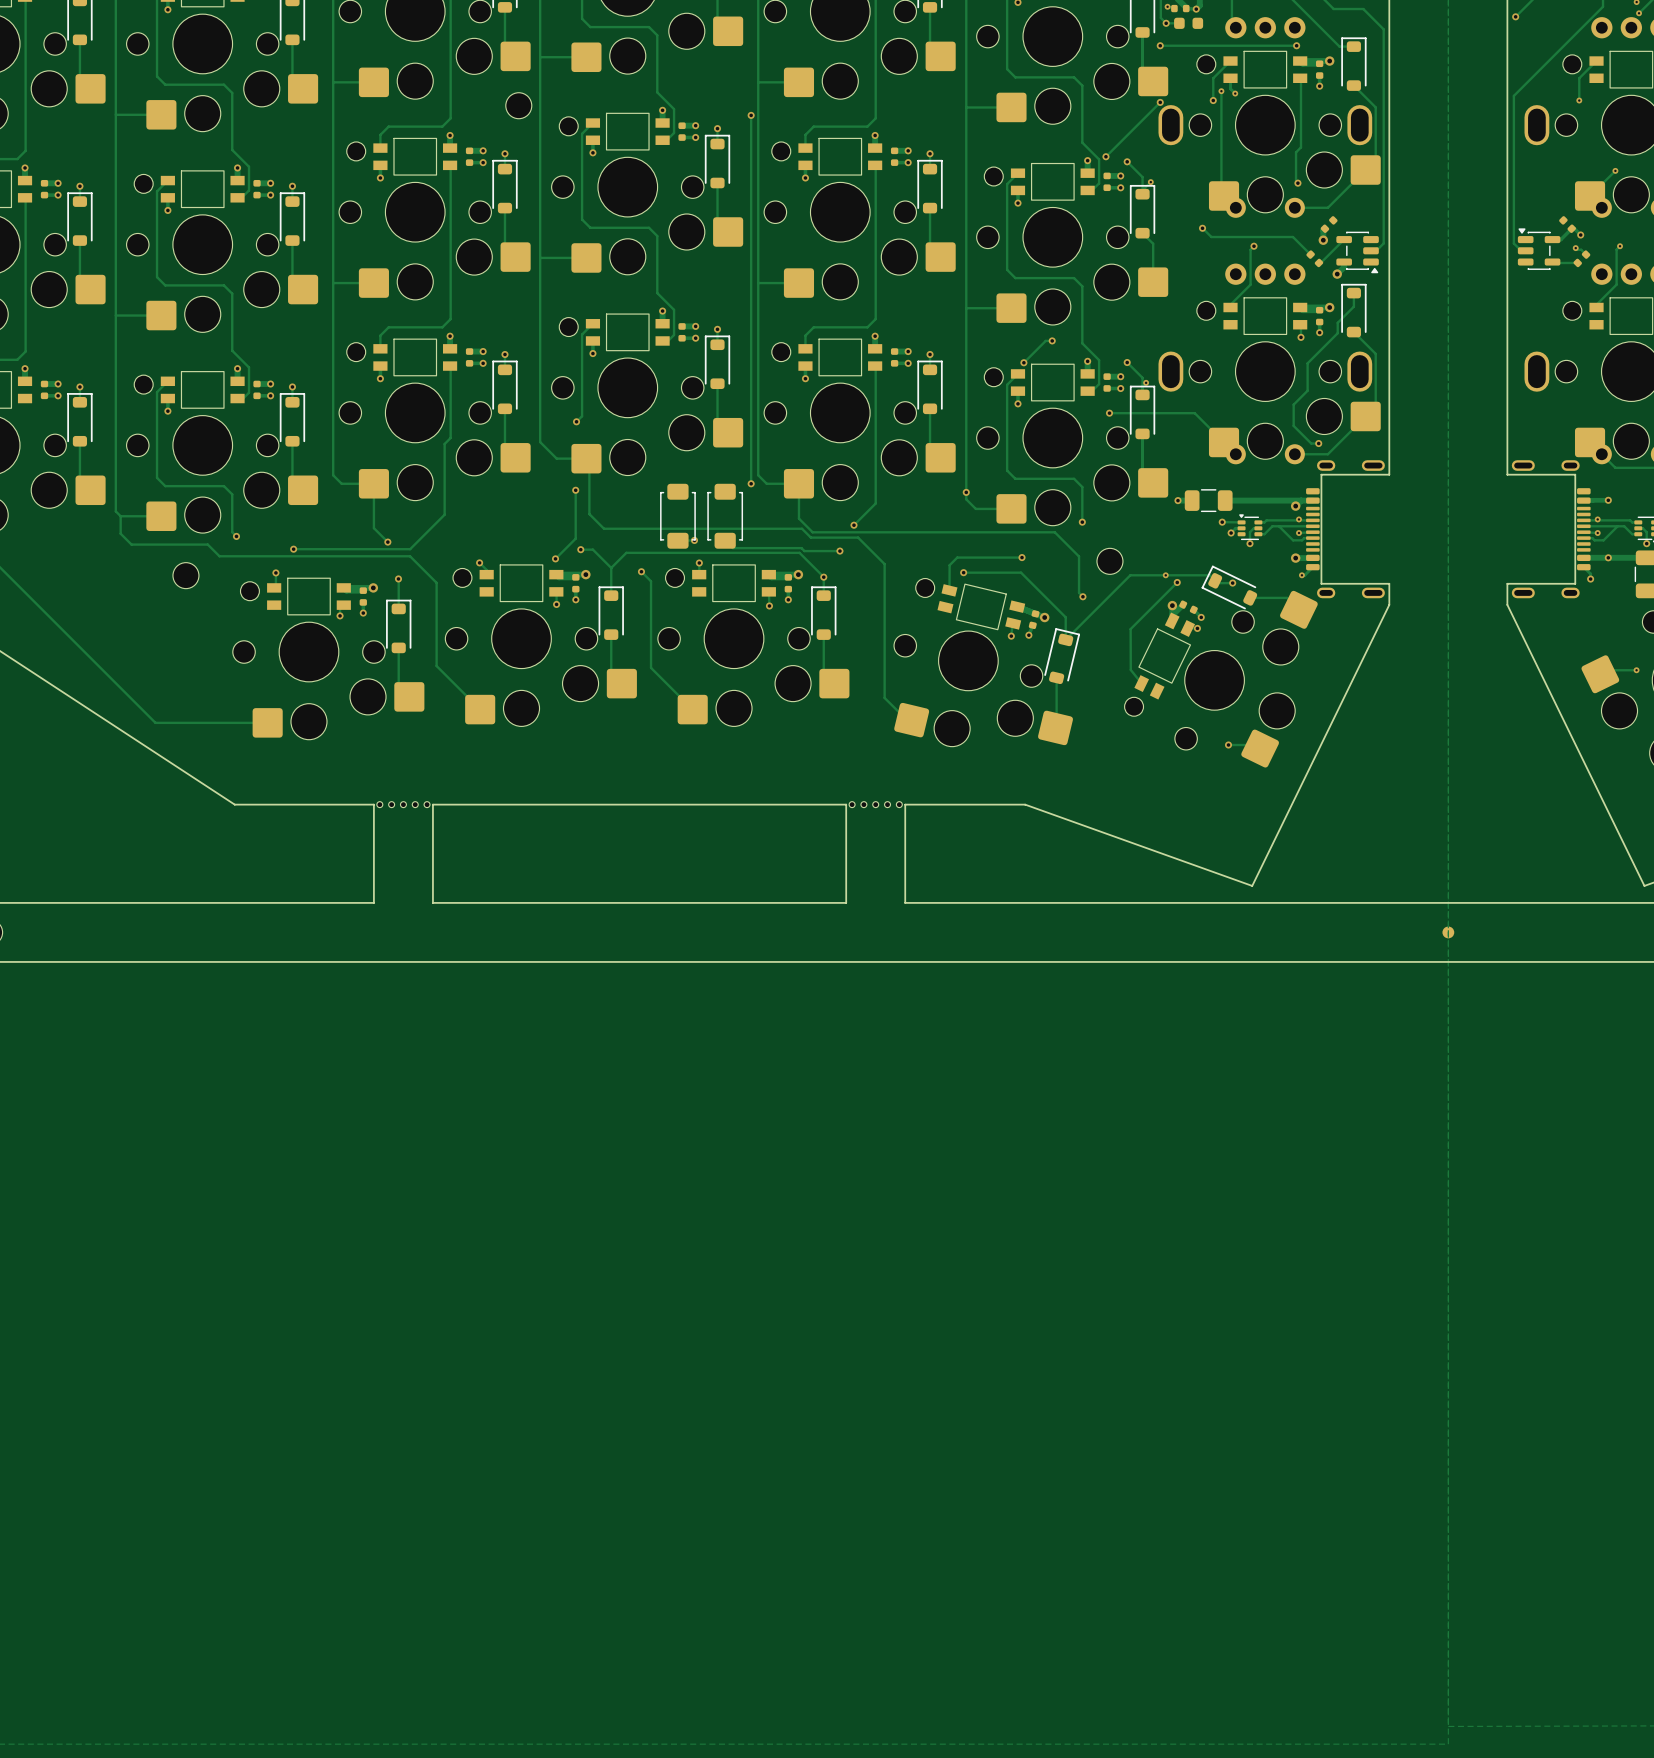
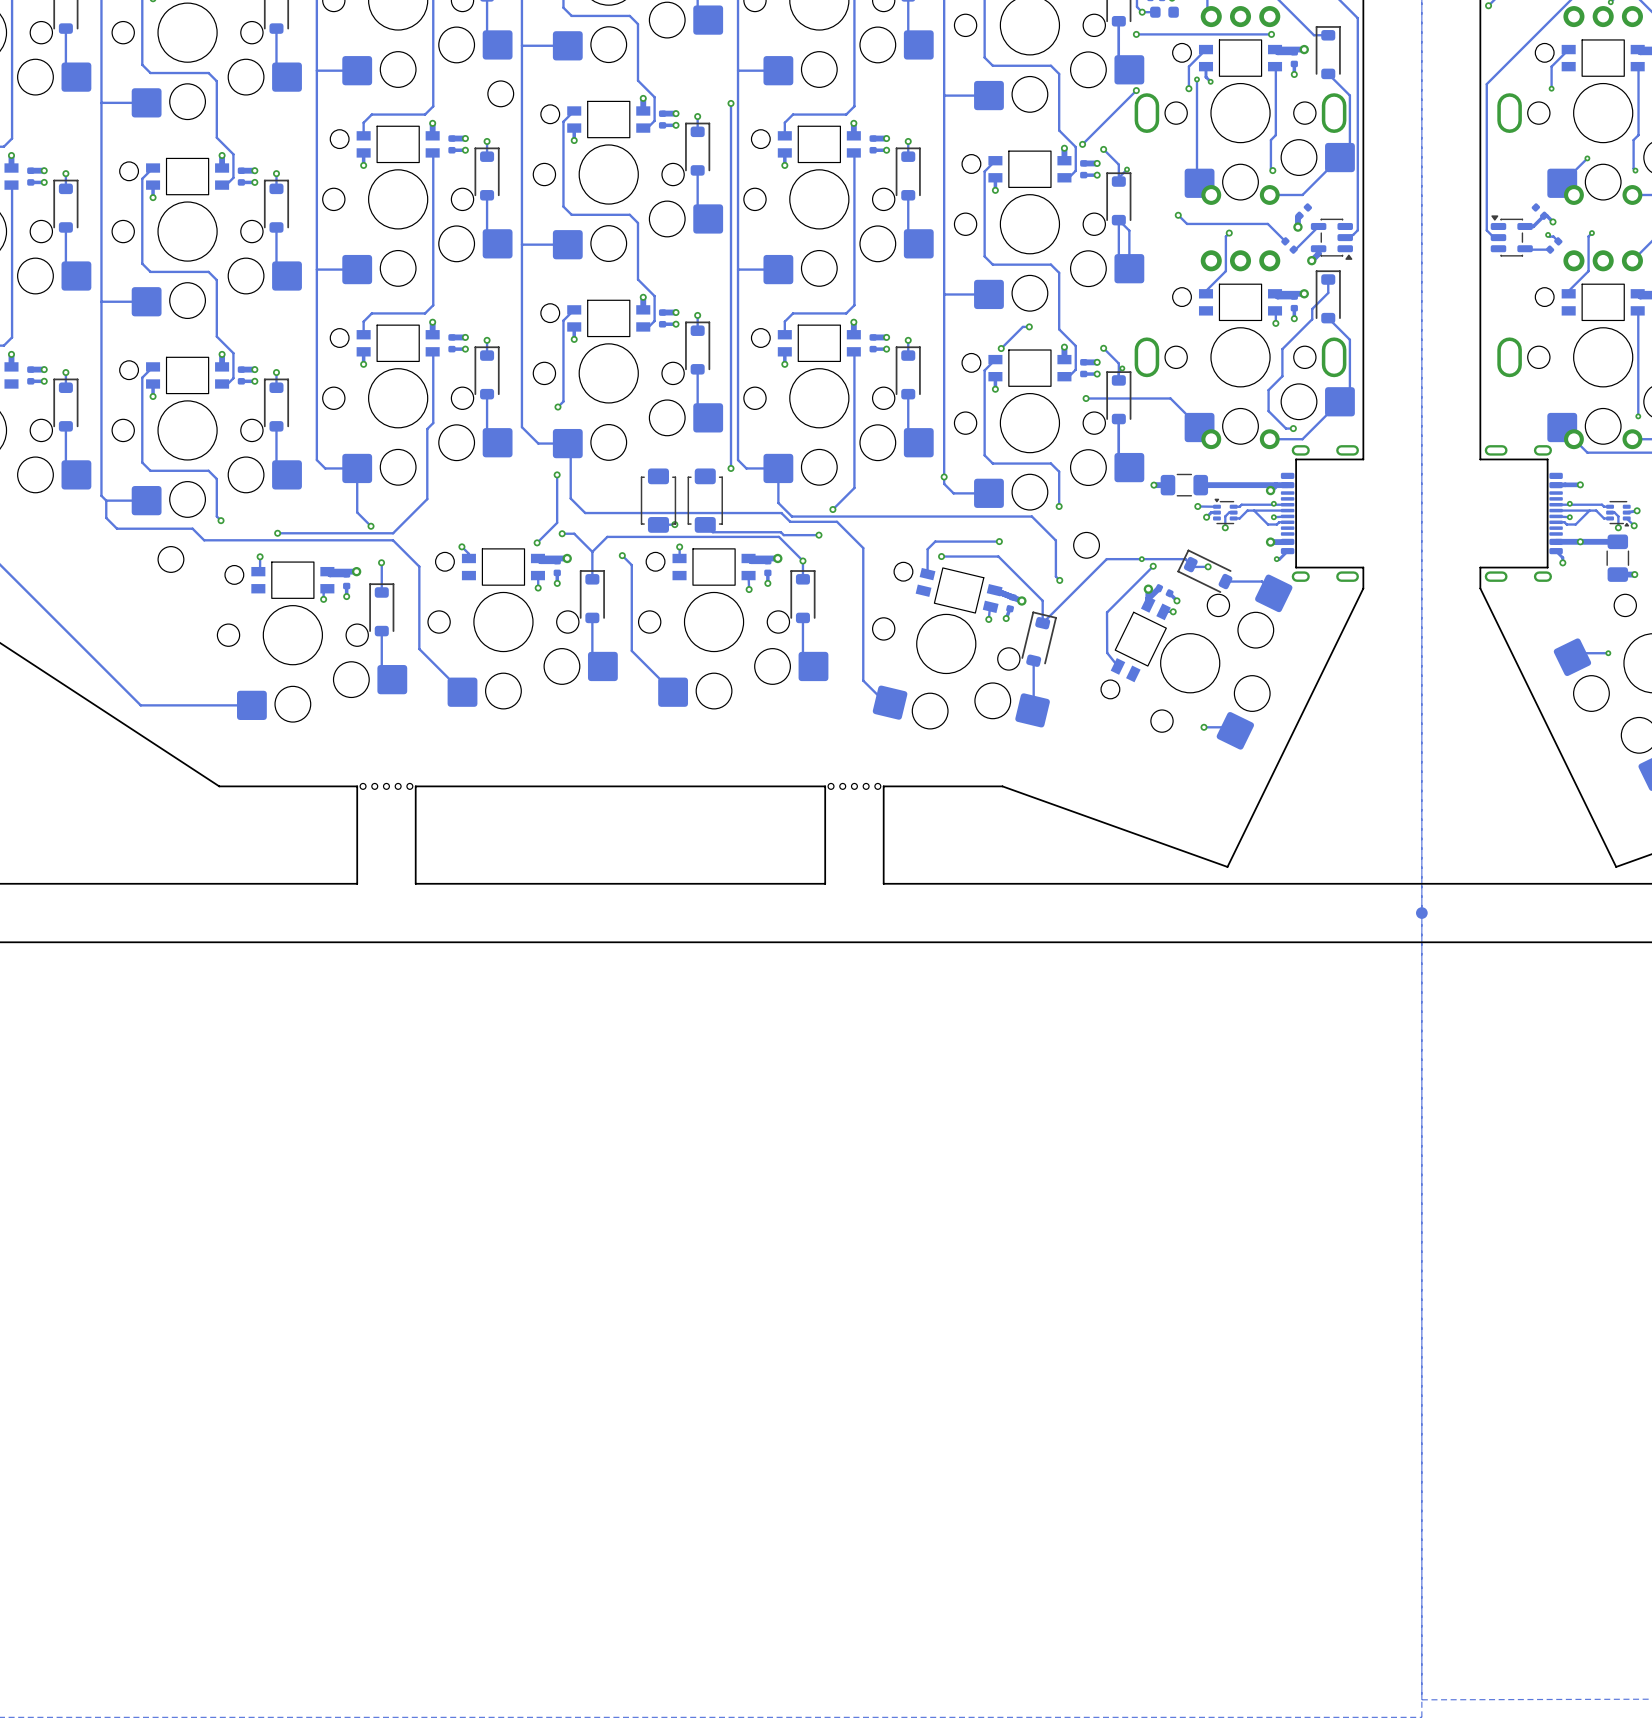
track: none -> (1118, 220) (1118, 258) (1129, 268)

